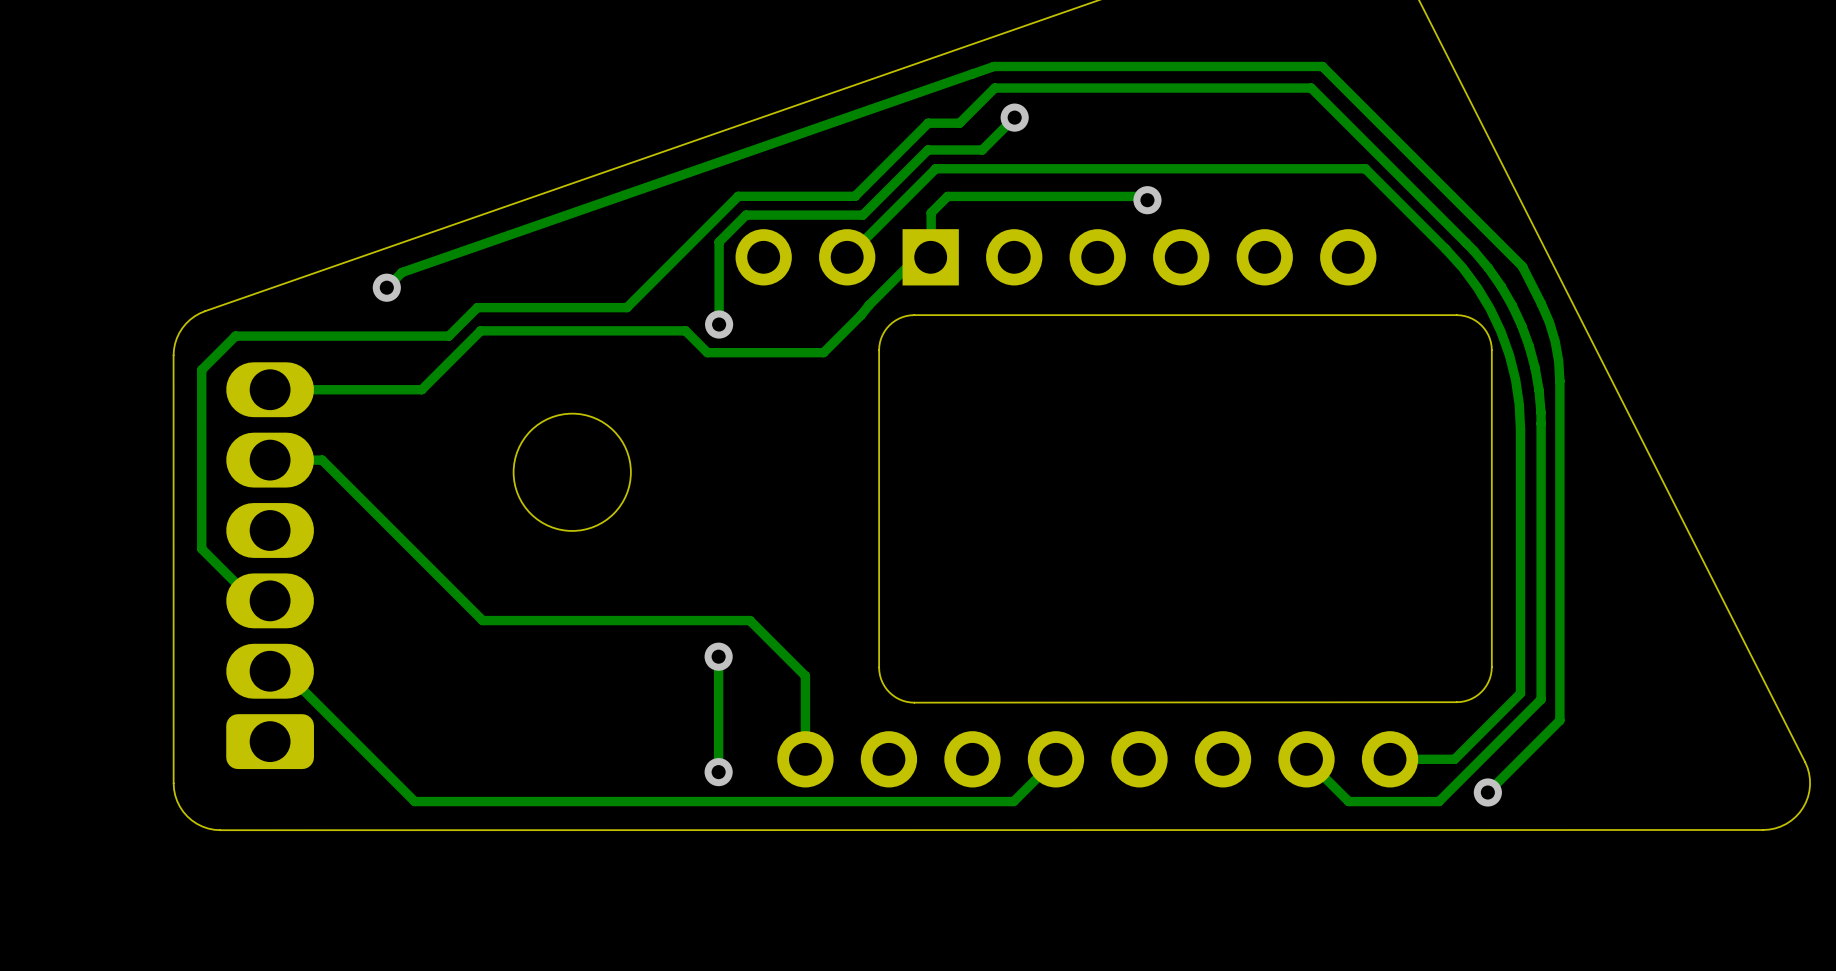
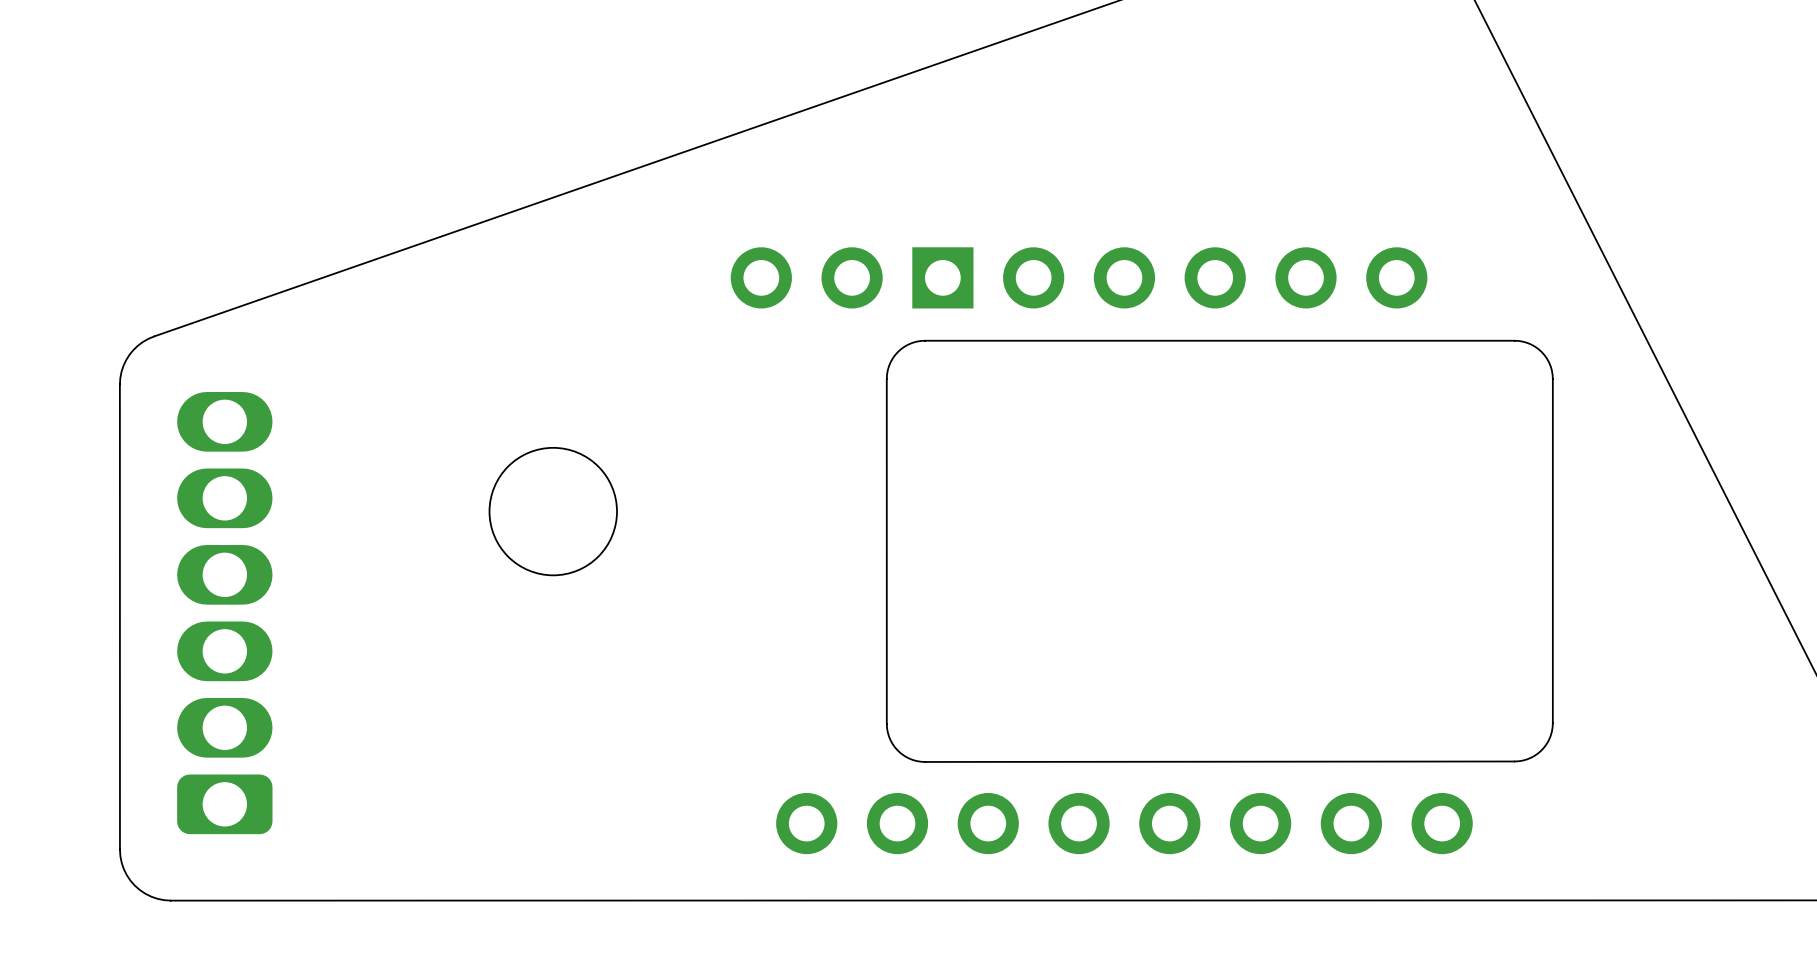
track: (1014, 117) (982, 149) (927, 149) (862, 215) (746, 215) (719, 242) (719, 324) -> none
via: (1014, 117) -> none
track: (1147, 200) (1143, 196) (947, 196) (931, 212) (931, 257) -> none
via: (1147, 200) -> none
track: (847, 257) (935, 168) (1365, 168) (1462, 267) (1490, 309) (1509, 355) (1515, 379) (1520, 429) (1520, 693) (1454, 759) (1390, 759) -> none
track: (930, 257) (916, 257) (823, 352) (707, 352) (685, 330) (480, 330) (421, 389) (270, 389) -> none
track: (386, 287) (402, 272) (994, 66) (1322, 66) (1522, 266) (1541, 303) (1555, 341) (1559, 381) (1559, 720) (1487, 792) -> none
via: (386, 287) -> none
via: (719, 324) -> none
track: (270, 460) (322, 460) (482, 620) (750, 620) (805, 676) (805, 759) -> none
track: (270, 600) (253, 600) (201, 548) (201, 369) (235, 336) (448, 336) (477, 307) (626, 307) (738, 196) (855, 196) (928, 123) (959, 123) (994, 88) (1311, 88) (1474, 251) (1501, 286) (1521, 325) (1535, 368) (1540, 412) (1541, 699) (1438, 801) (1348, 801) (1306, 759) -> none
track: (718, 656) (718, 772) -> none
via: (718, 656) -> none
track: (270, 671) (284, 671) (414, 801) (1013, 801) (1055, 759) -> none
via: (718, 772) -> none
via: (1487, 792) -> none

